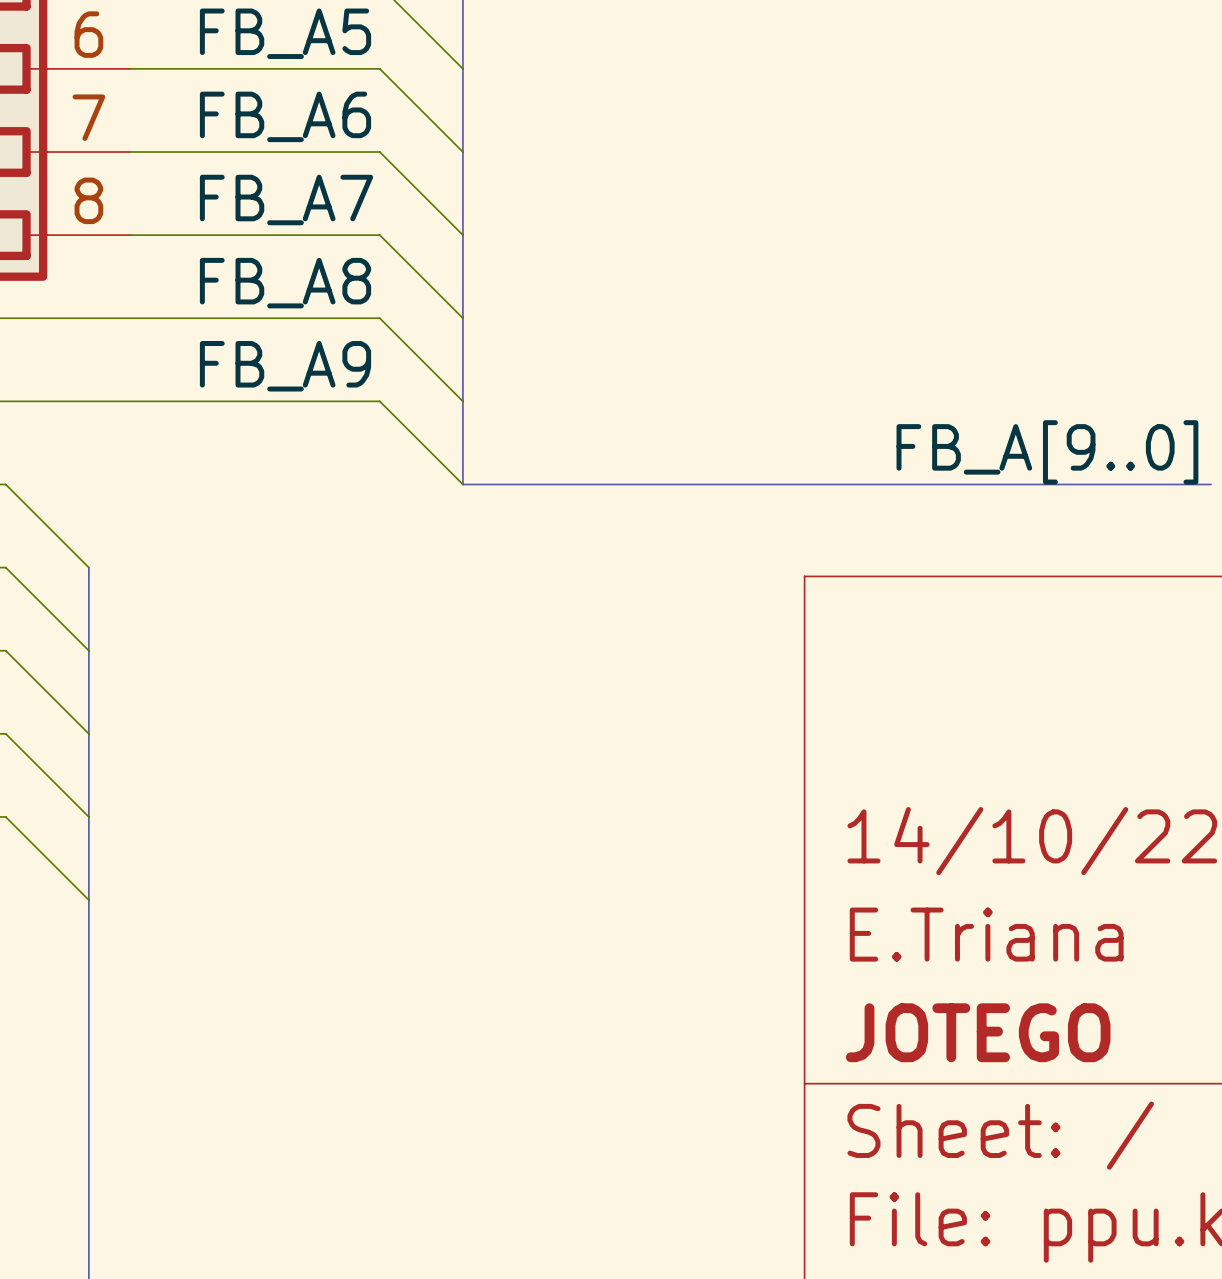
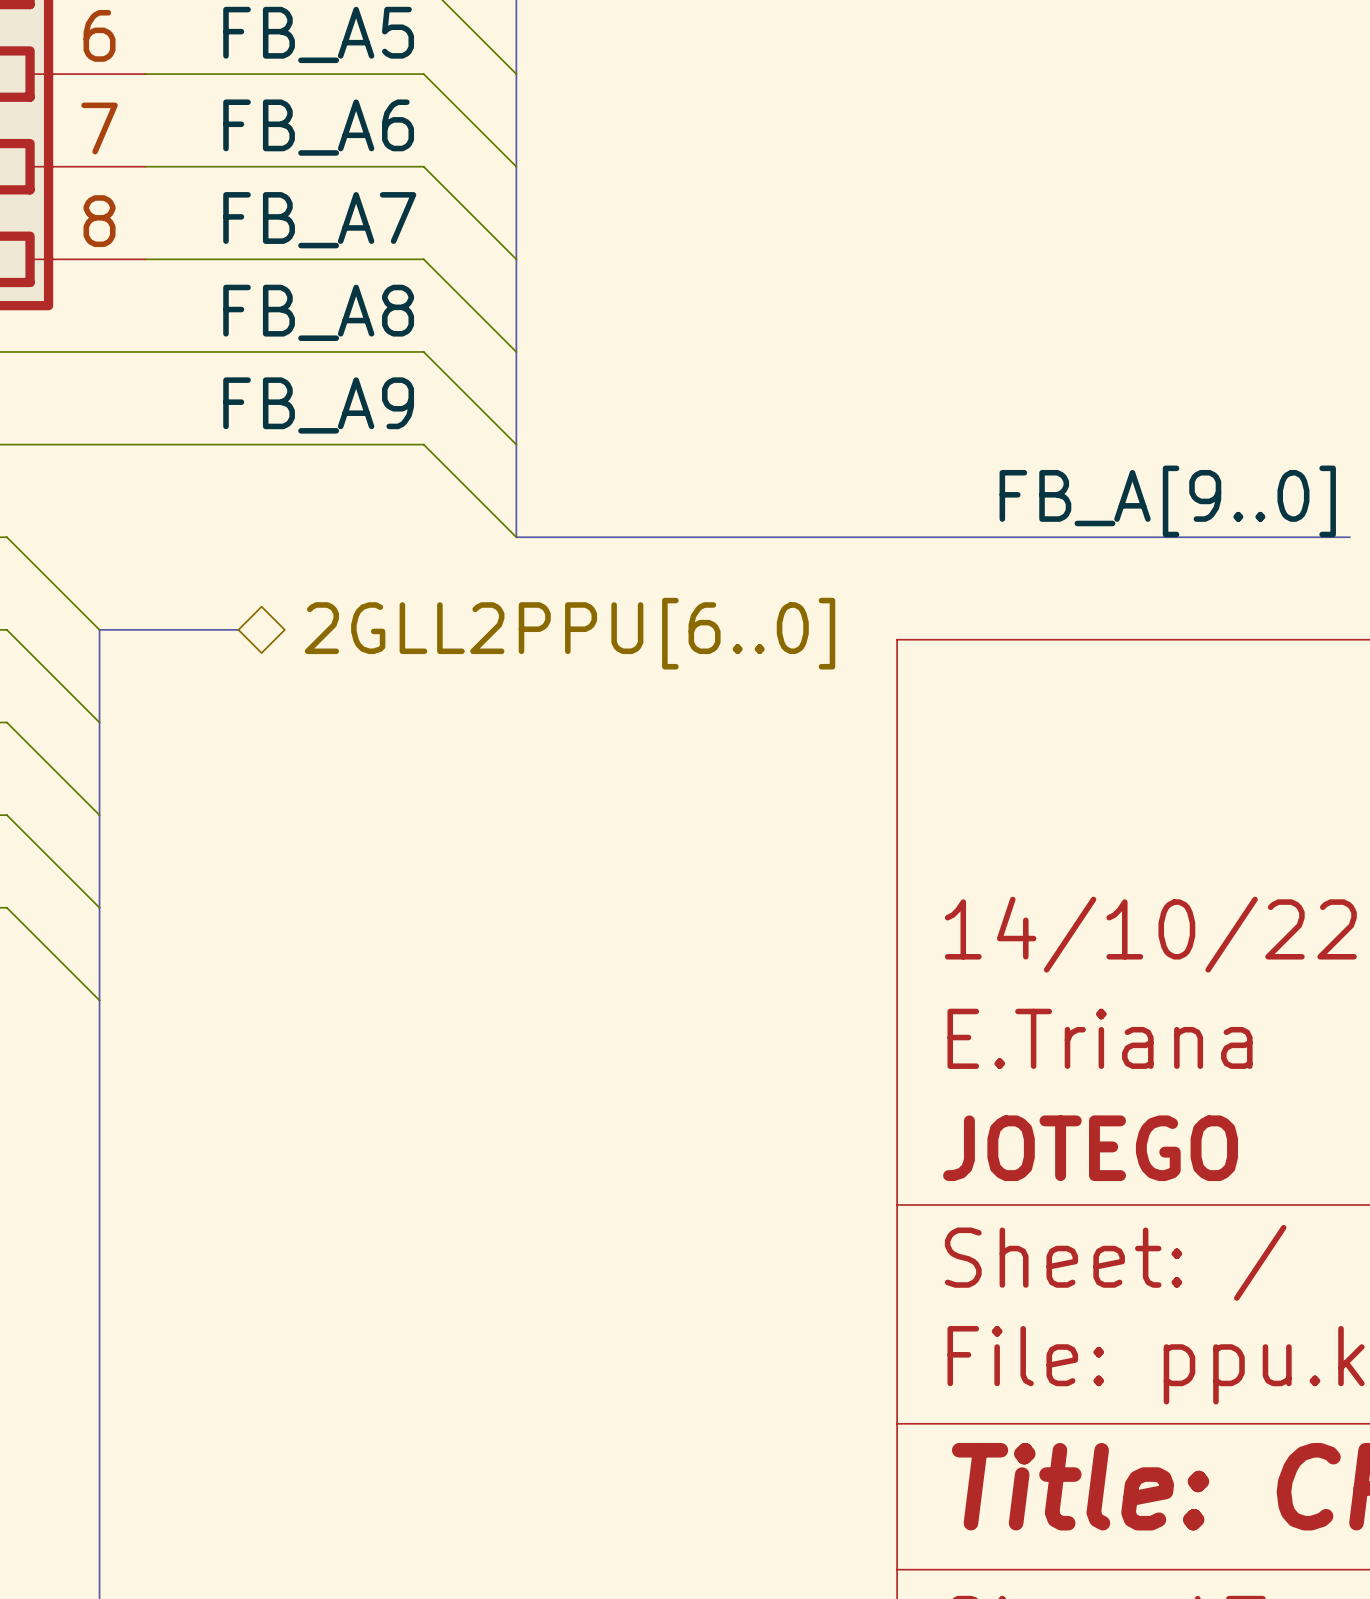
bus: none -> (99, 629) (238, 629)
hierarchical label: none -> 2GLL2PPU[6..0] (570, 633)

